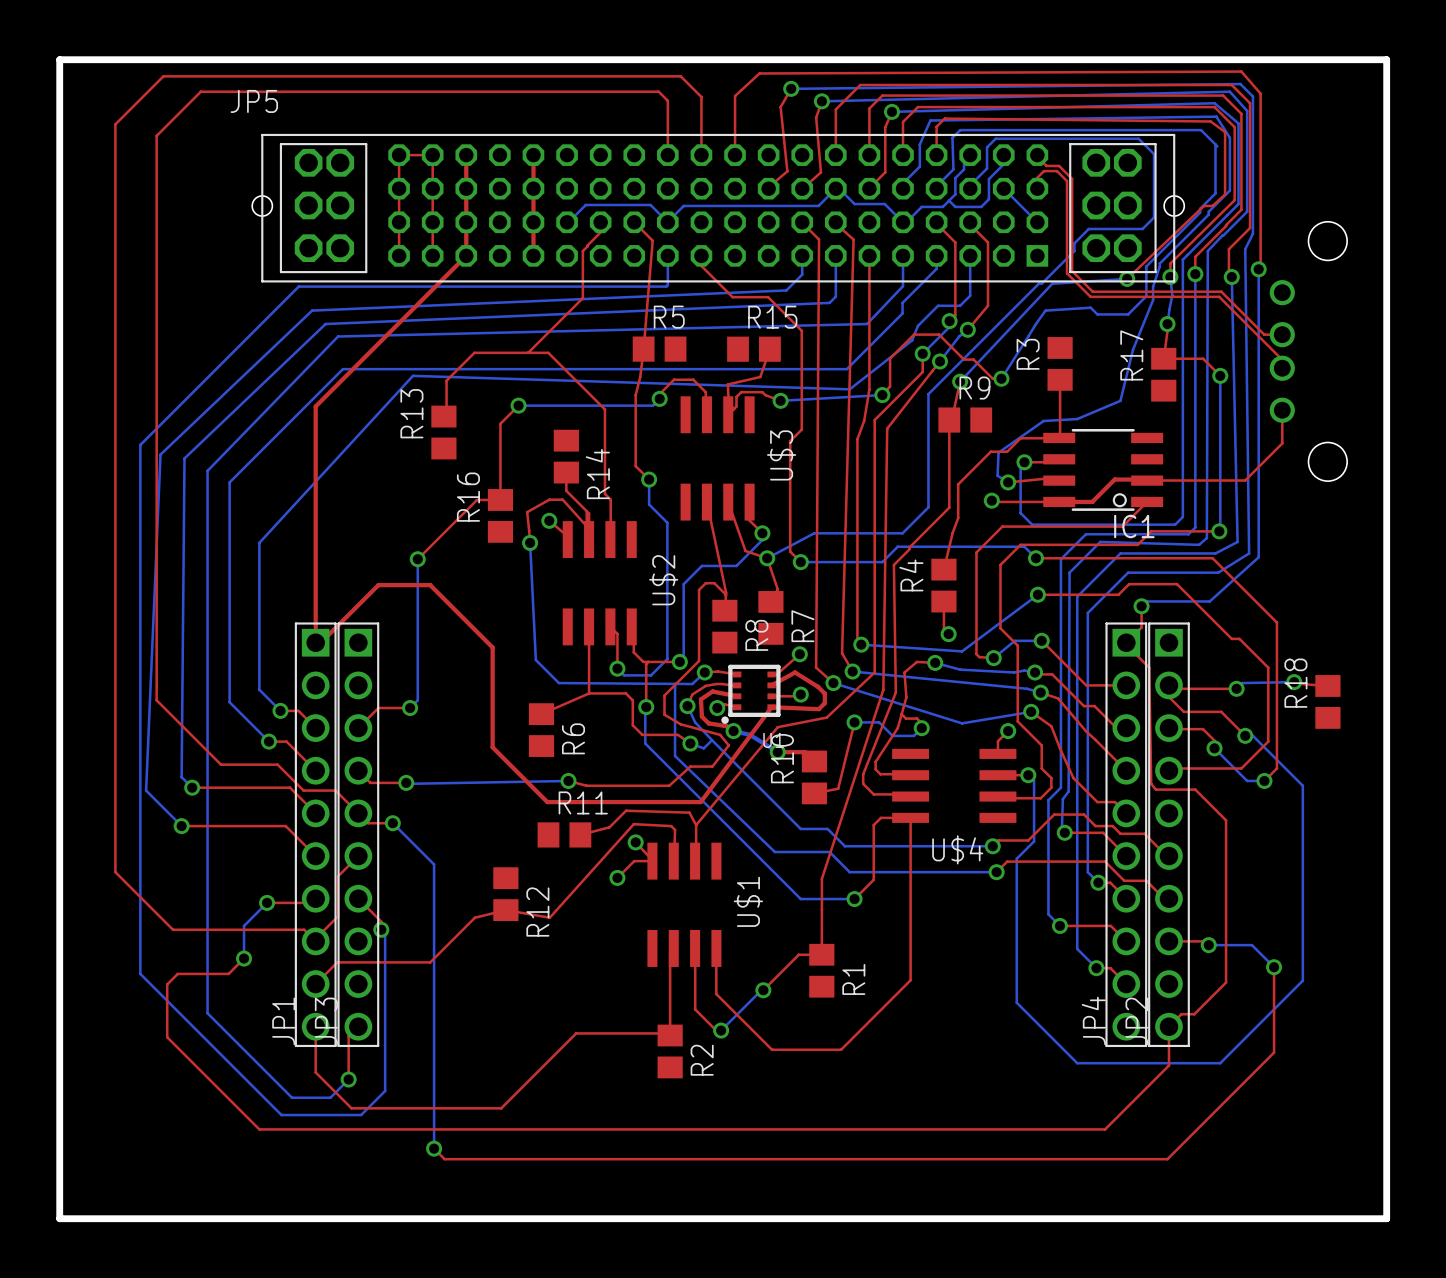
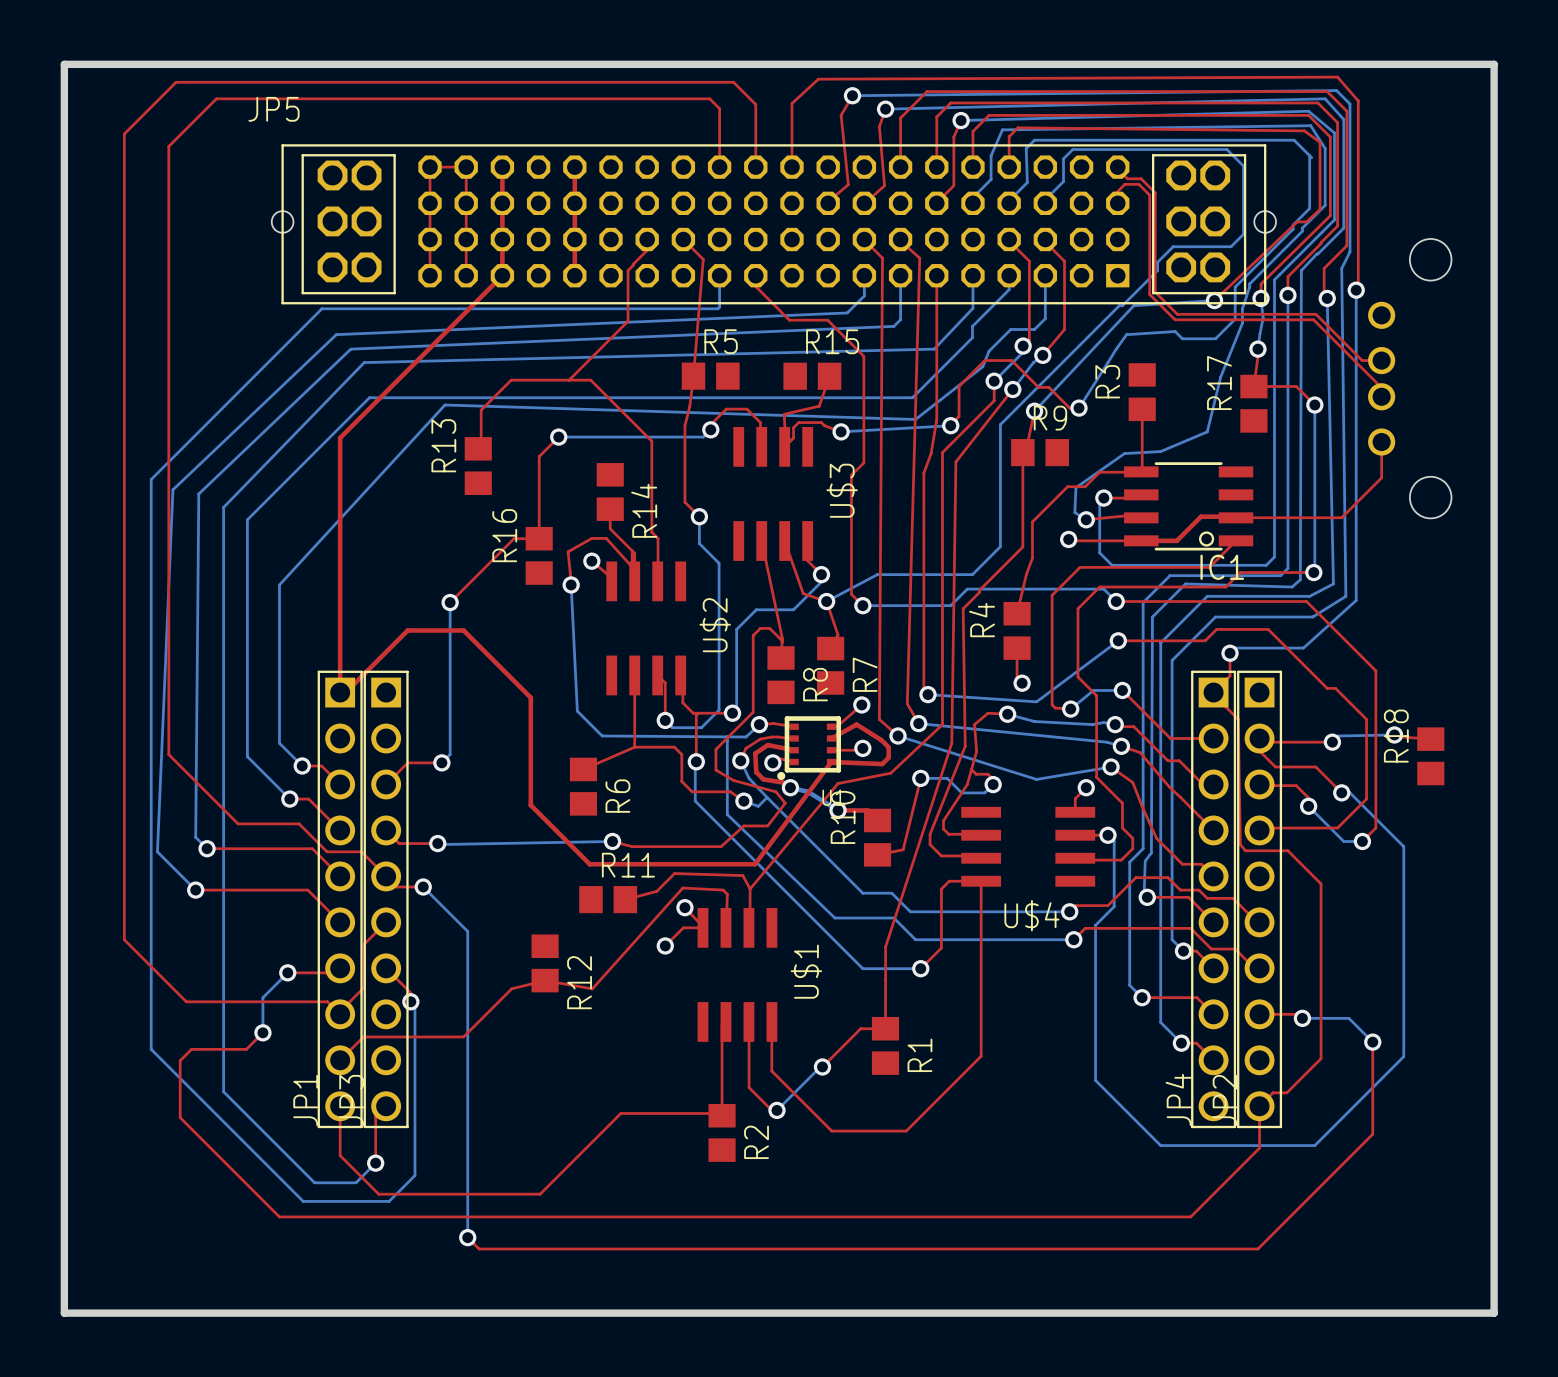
bottom track: (970, 155) (963, 161) (963, 169) (955, 178) (955, 194) (942, 206) (921, 206) (906, 222) (903, 222) (884, 204) (854, 204) (839, 188) (835, 188) (818, 205) (683, 205) (667, 222) (650, 205) (585, 205) (567, 222) -> none
bottom track: (1003, 155) (1003, 164) (988, 179) (988, 199) (981, 206) (955, 206) (949, 200) -> none
bottom track: (1003, 188) (1037, 222) -> none

